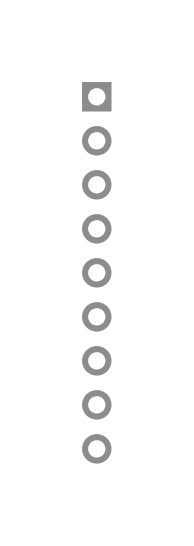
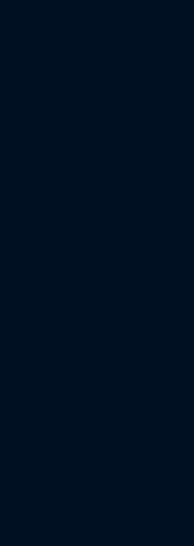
part: (96, 272) -> none

